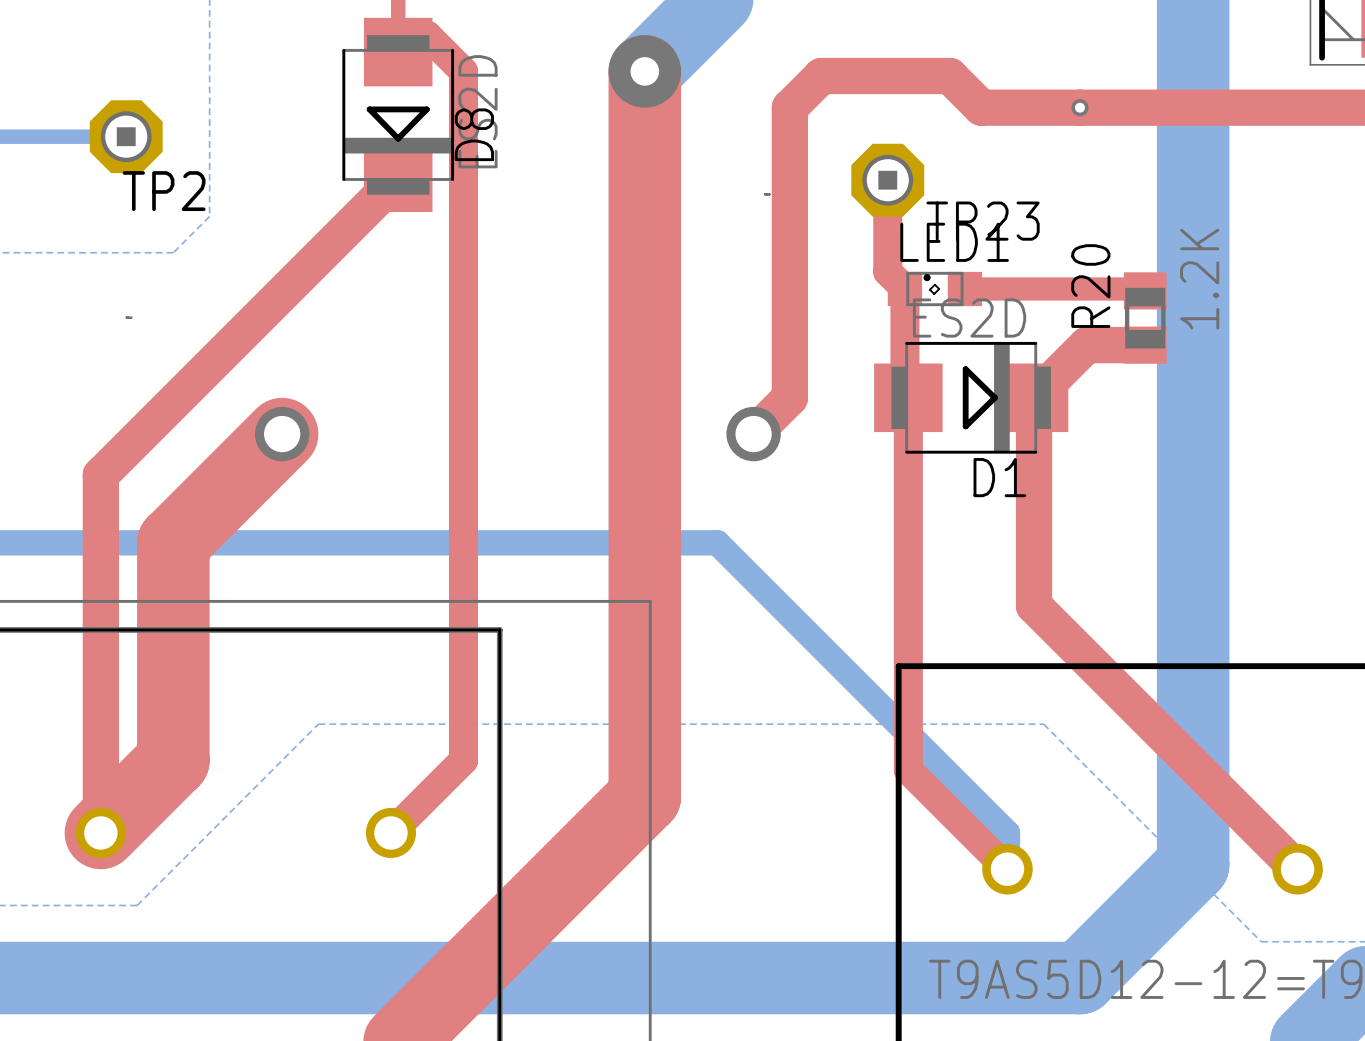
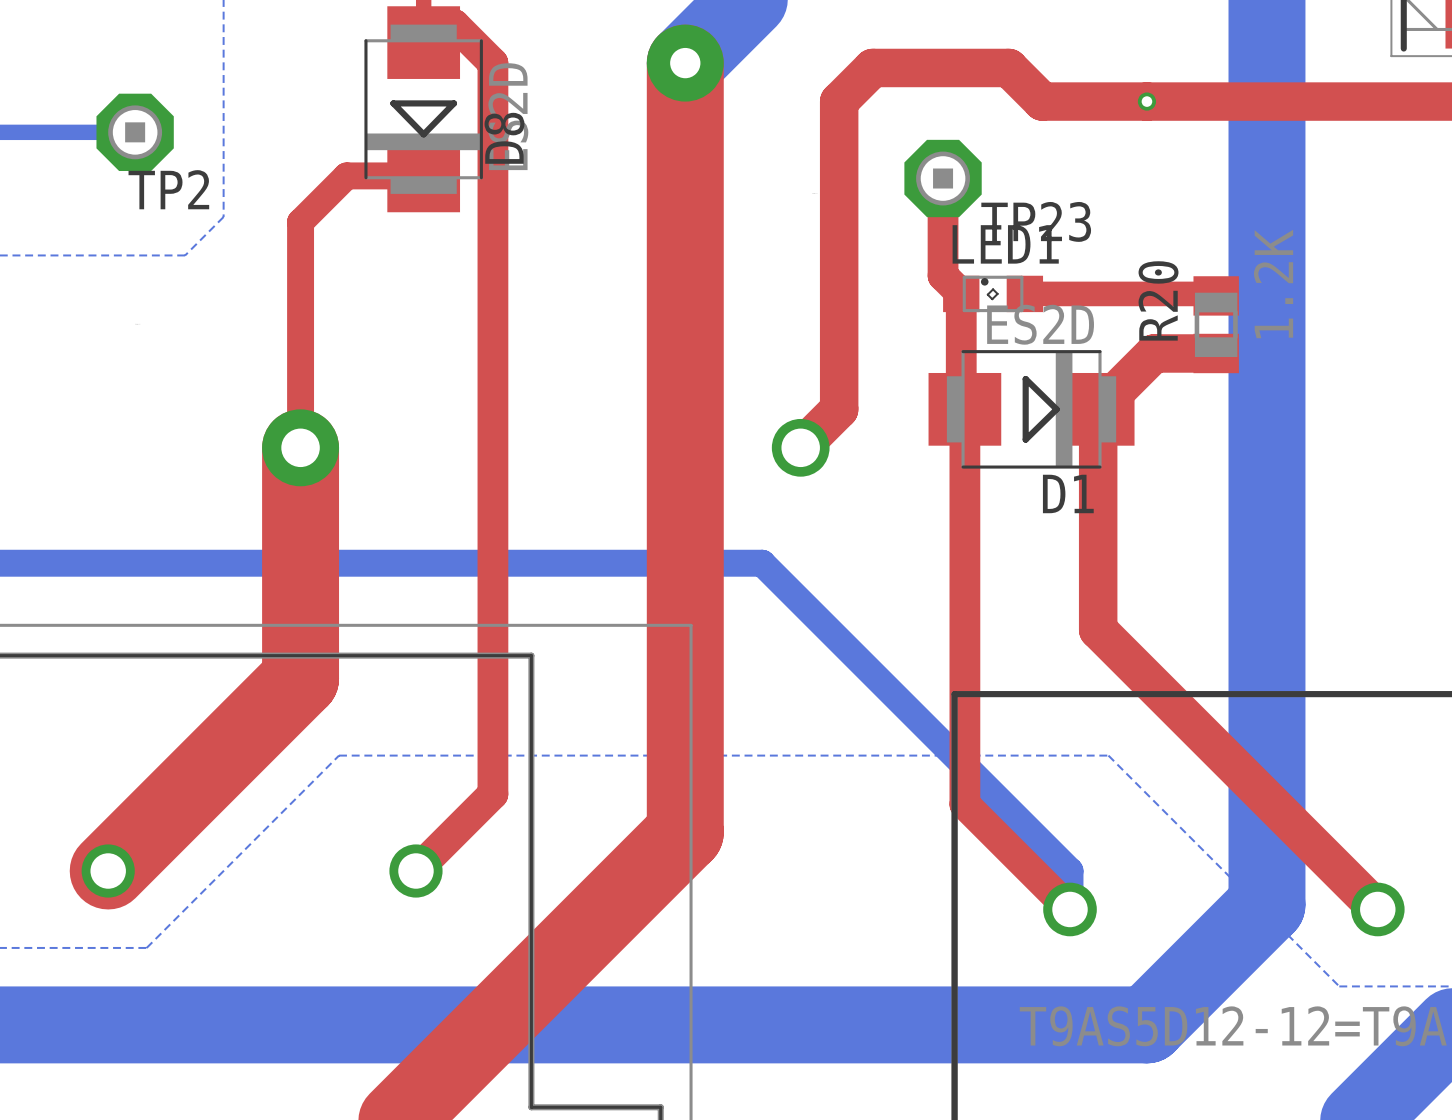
top track: (398, 177) (100, 475) (100, 832) -> (423, 175) (346, 175) (300, 222) (300, 678) (185, 794)
via size: [254, 406, 310, 462] -> [262, 409, 340, 487]
top track: (282, 434) (173, 542) (173, 760) -> none

